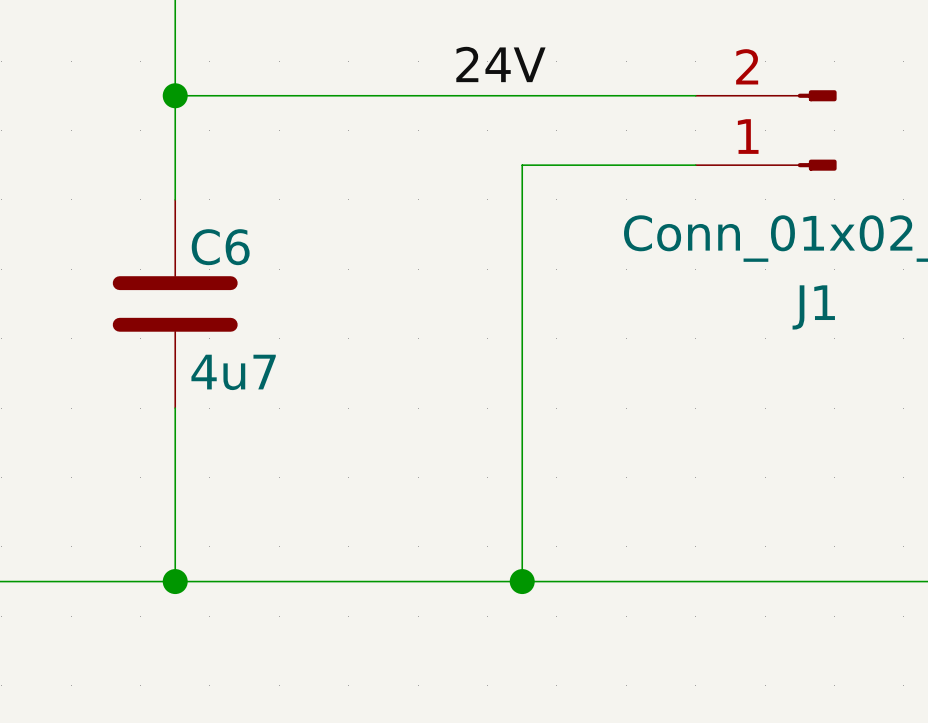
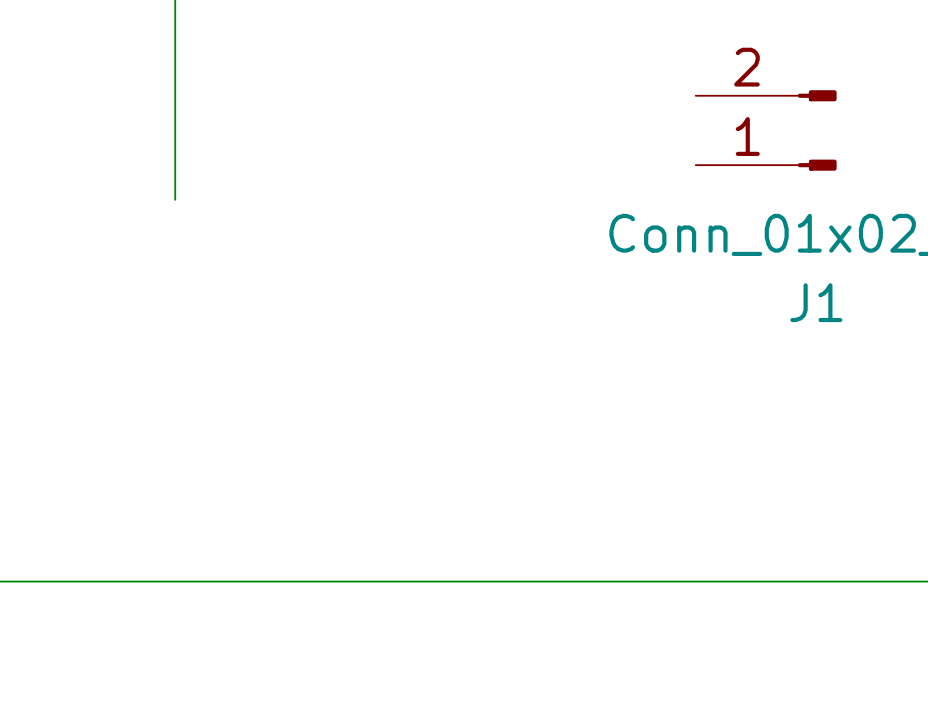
label: 24V (500, 64) -> none
wire: (175, 95) (695, 95) -> none
junction: (175, 95) -> none
wire: (695, 165) (522, 165) (522, 581) -> none
C6: 4u7 (175, 303) -> none
wire: (175, 408) (175, 581) -> none
junction: (175, 581) -> none
junction: (522, 581) -> none

